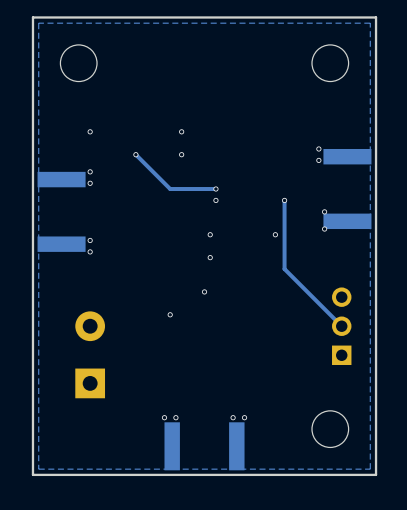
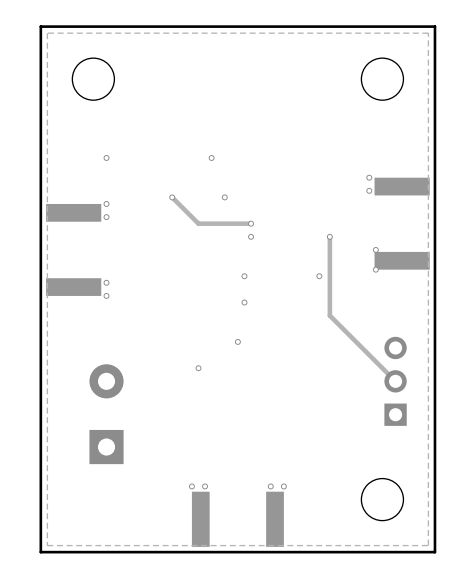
track: (135, 154) (147, 166) -> none
via position: (135, 154) -> (172, 197)
via position: (181, 154) -> (224, 197)

